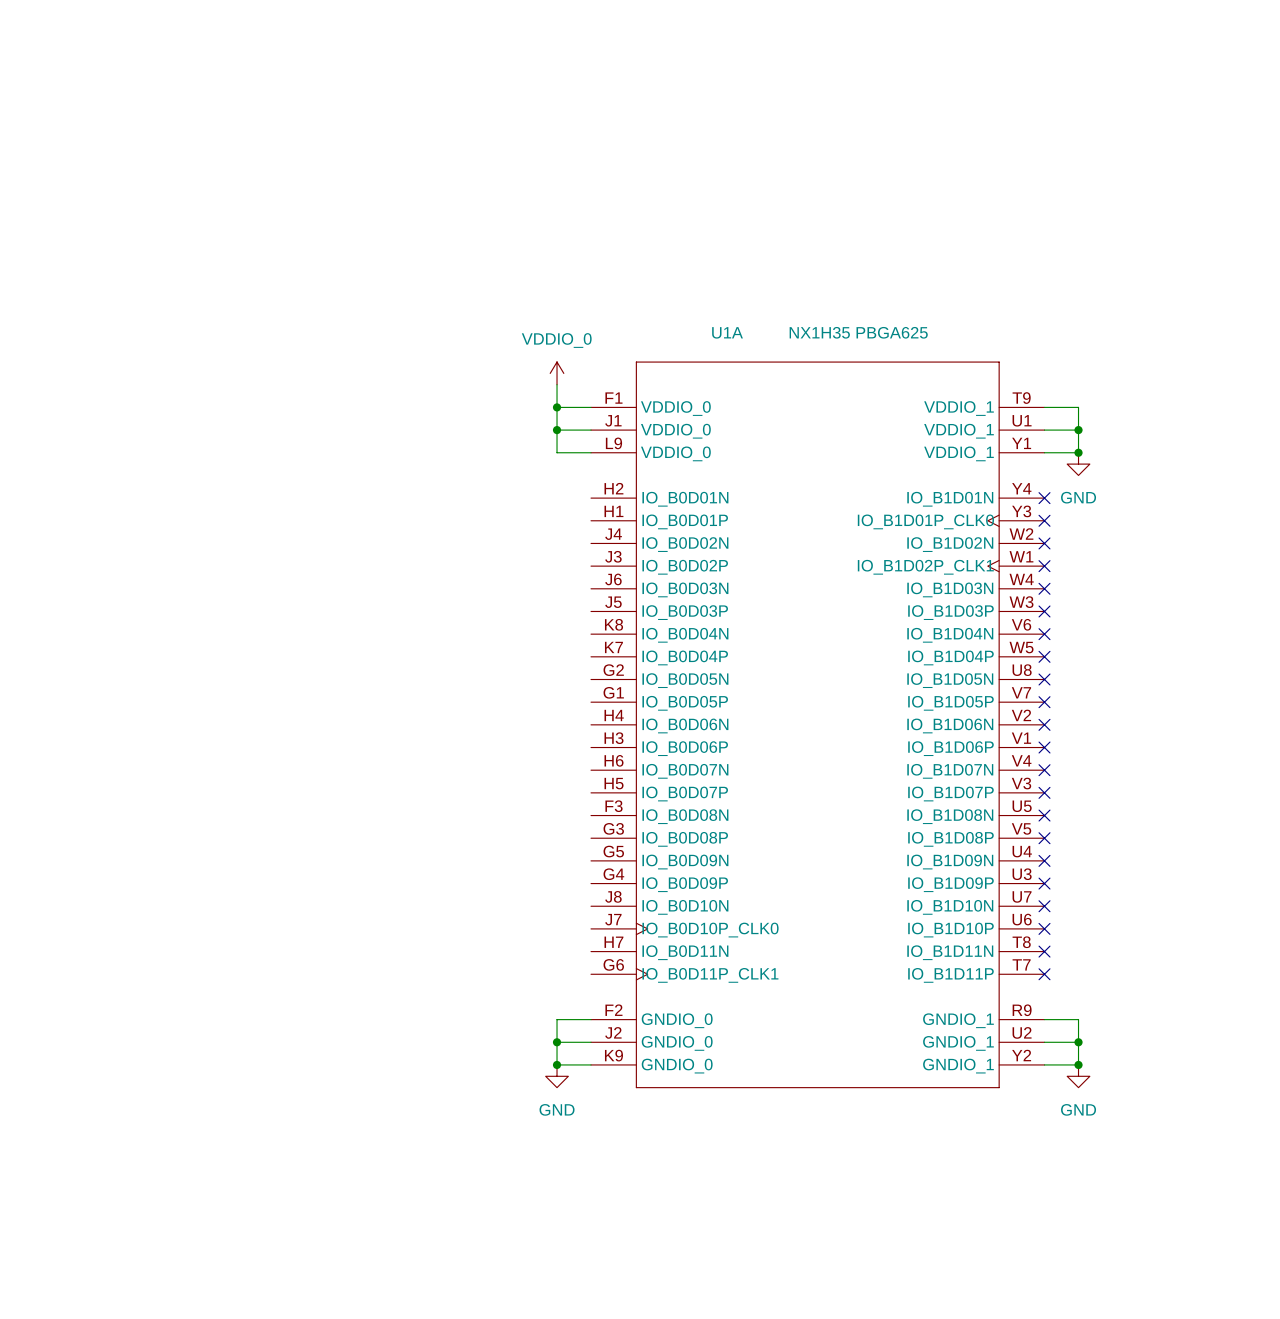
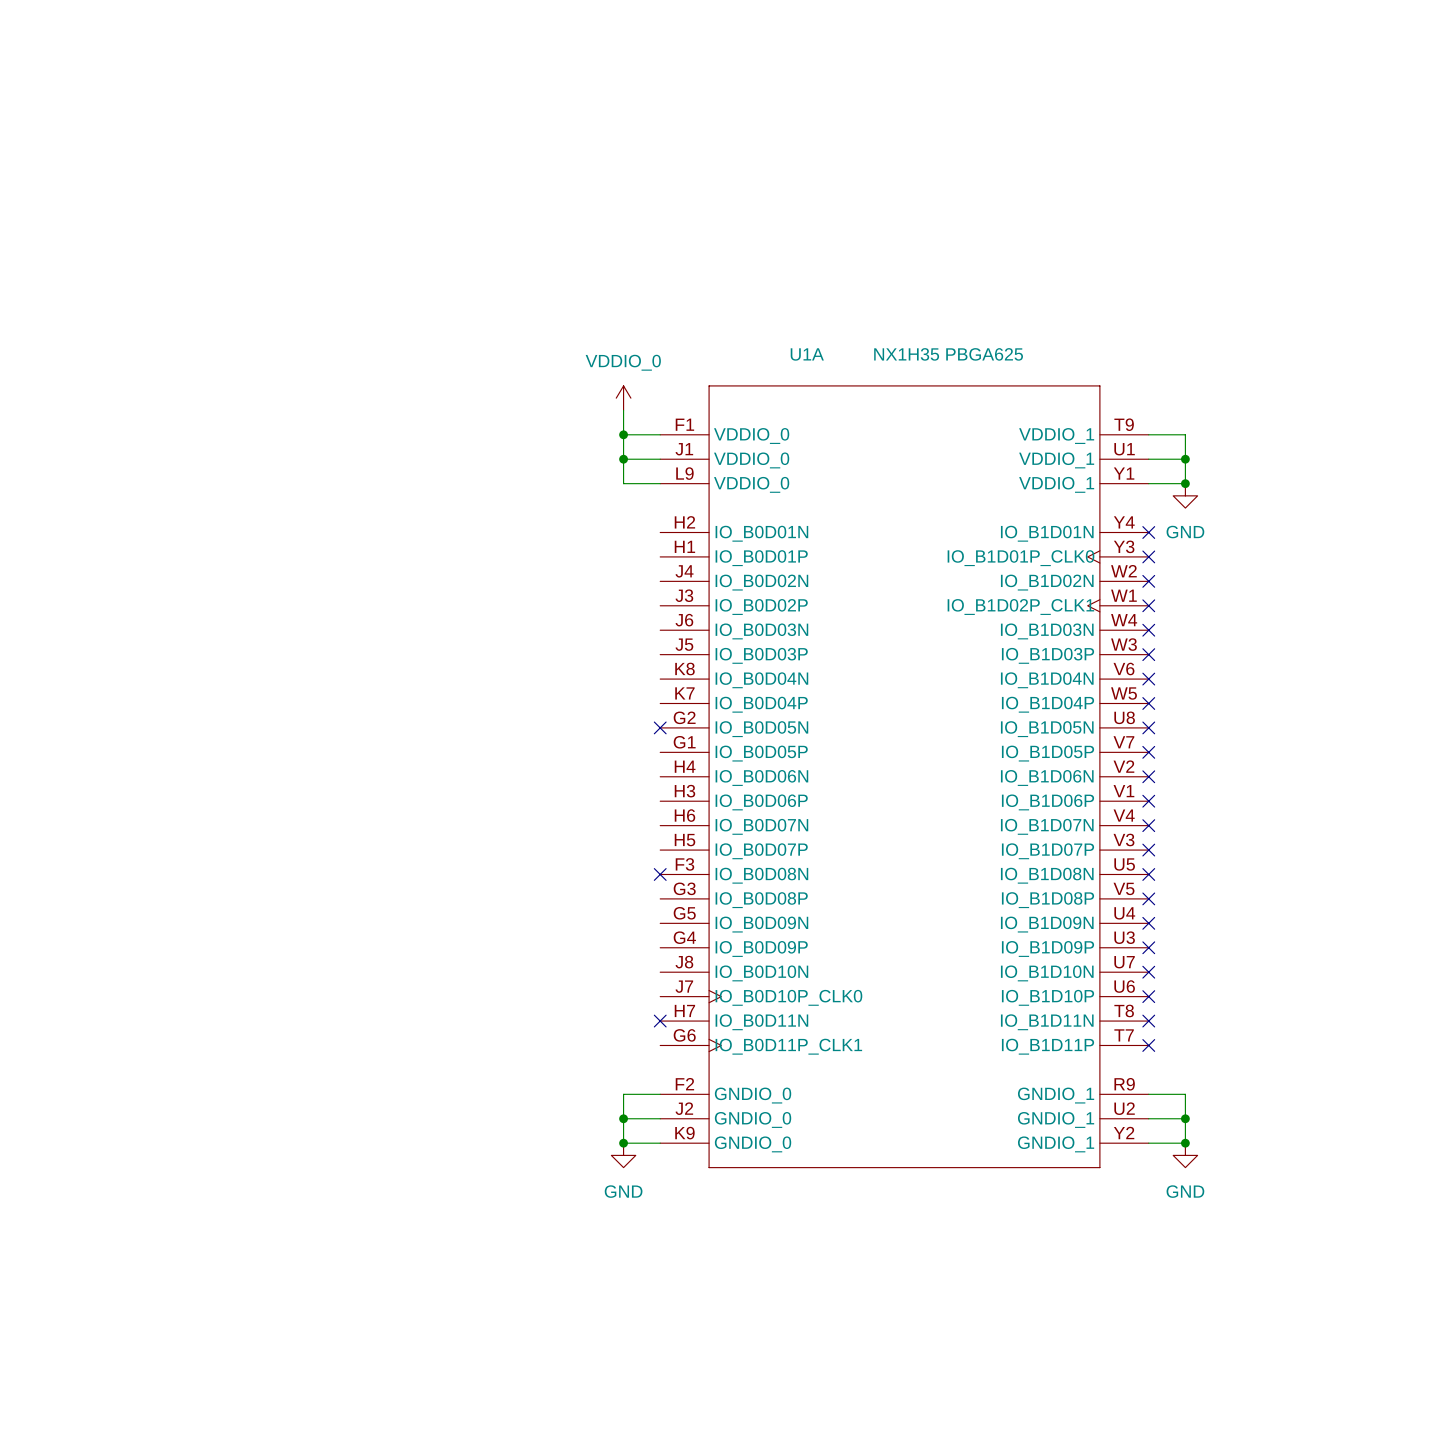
no-connect mark: none -> (660, 727)
no-connect mark: none -> (660, 874)
no-connect mark: none -> (660, 1021)

